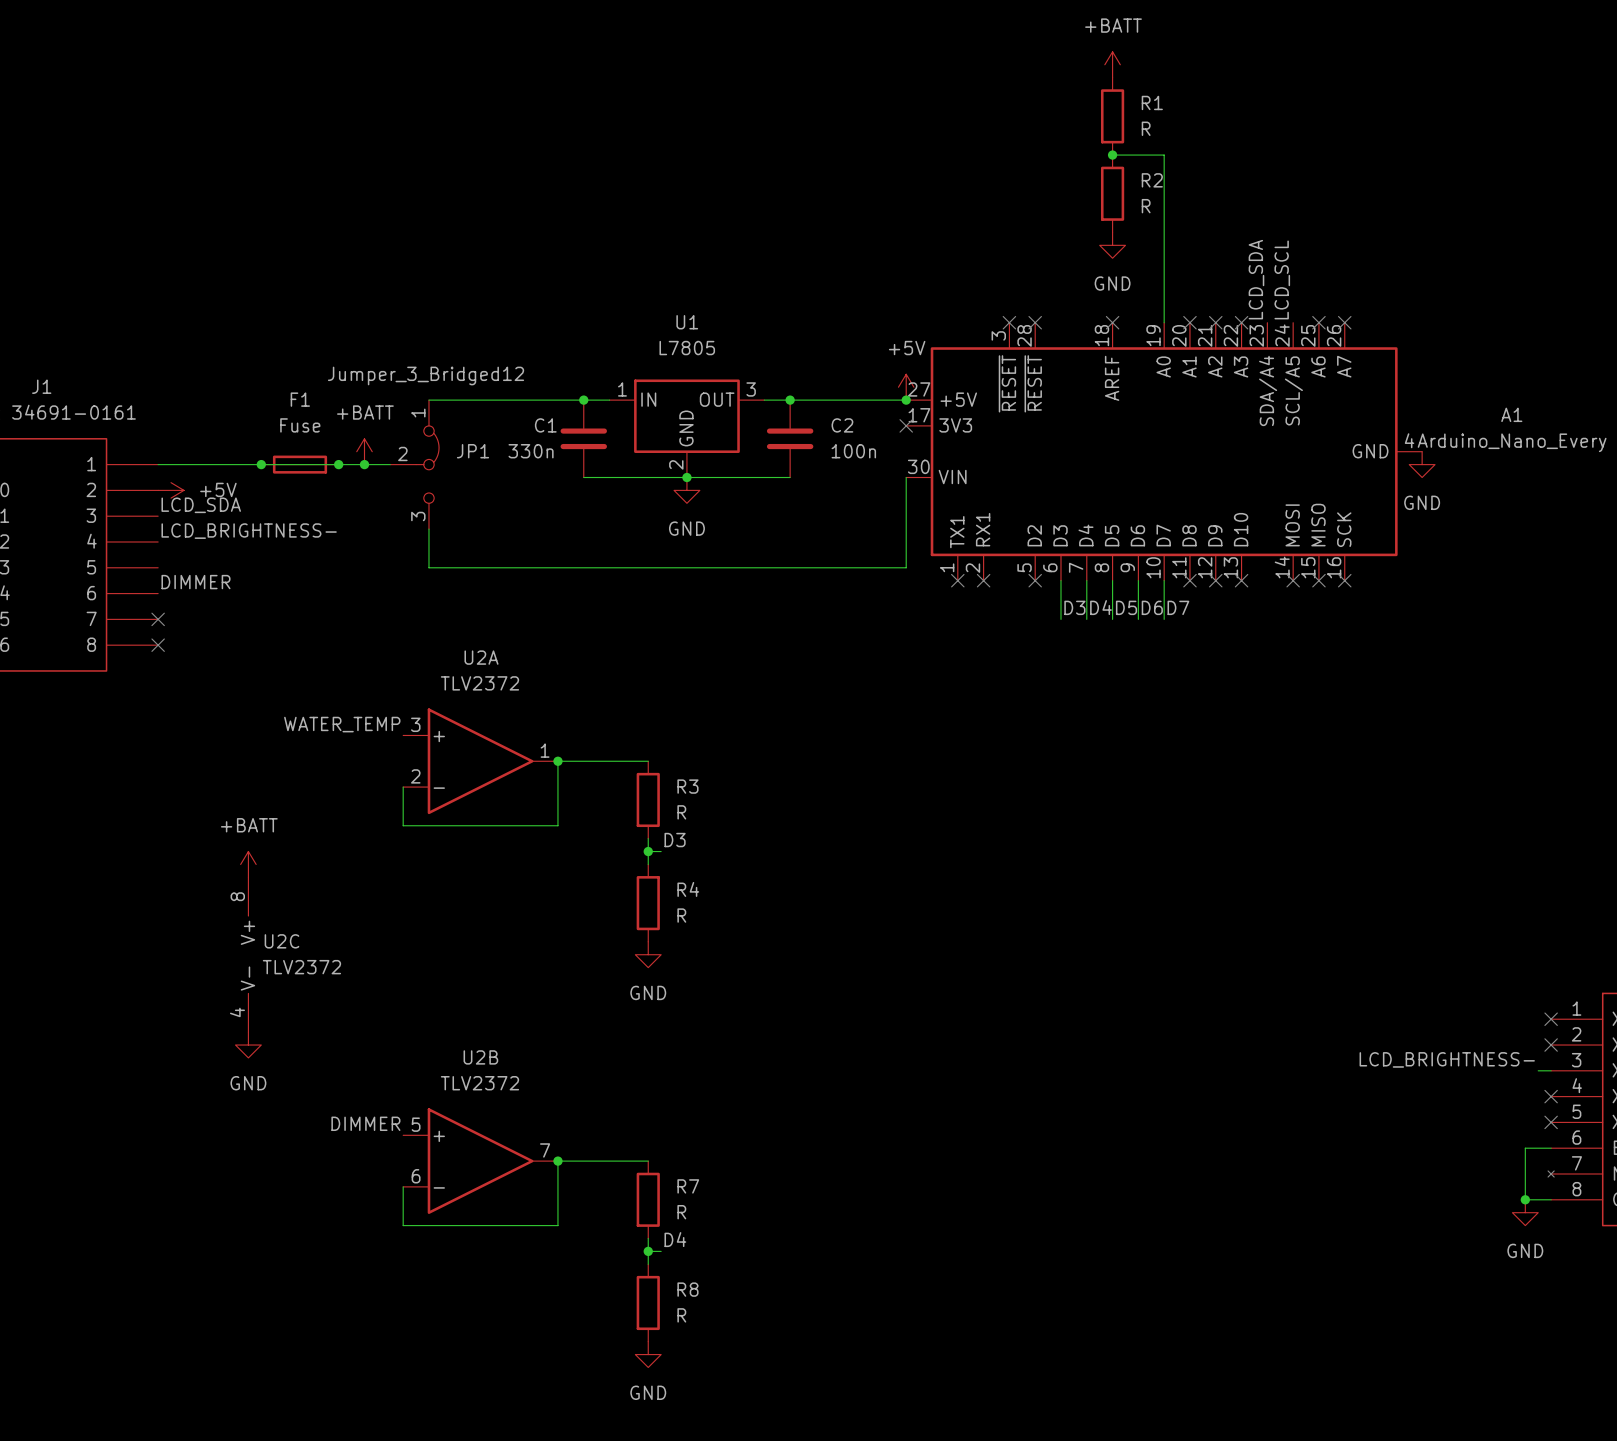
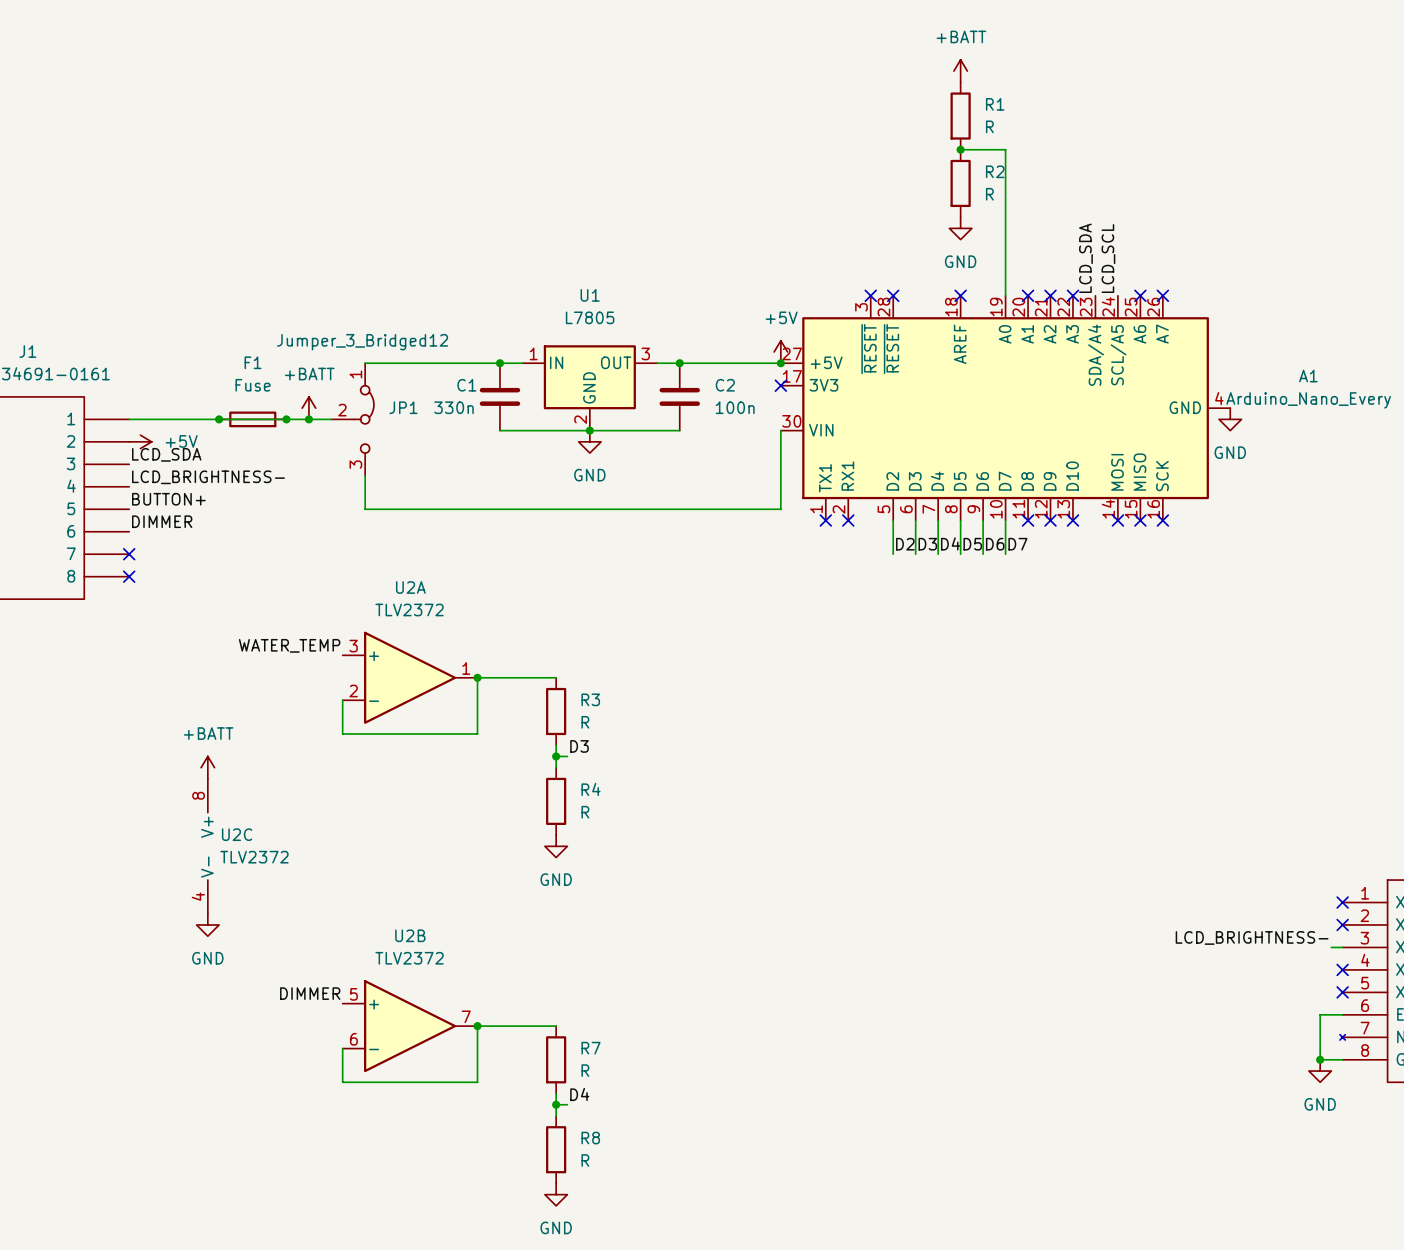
label: none -> BUTTON+ (168, 499)
wire: none -> (893, 520) (893, 554)
no-connect mark: (1035, 580) -> none
label: none -> D2 (905, 544)

